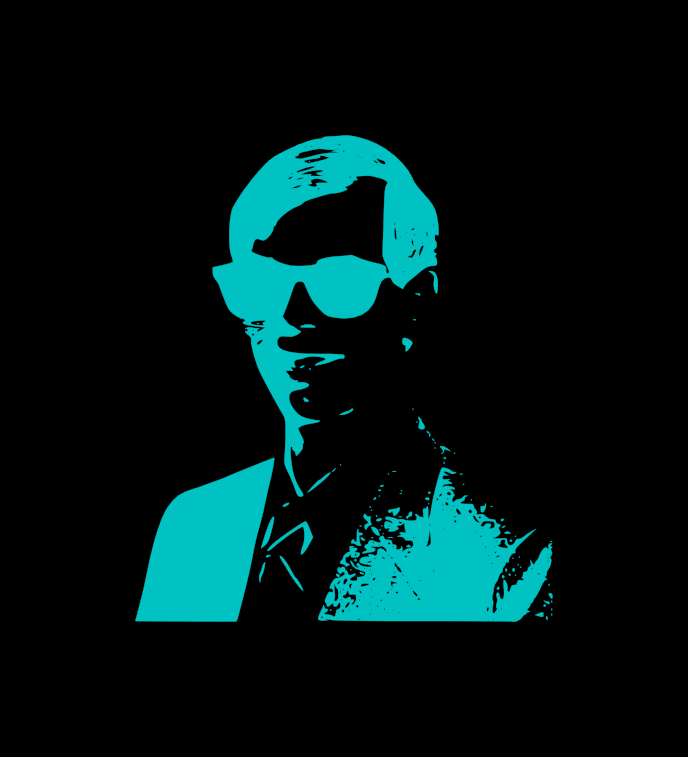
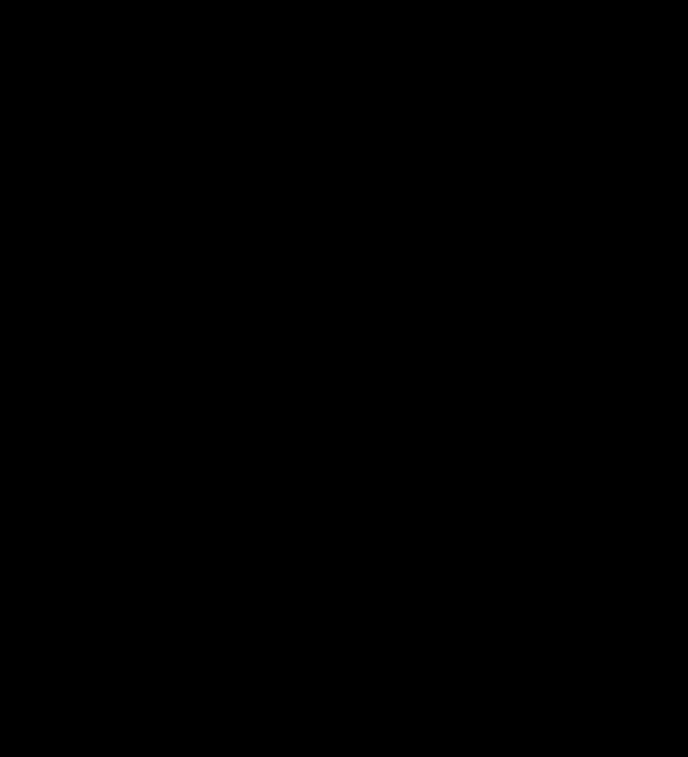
drawing: [135, 135, 553, 623] -> none

